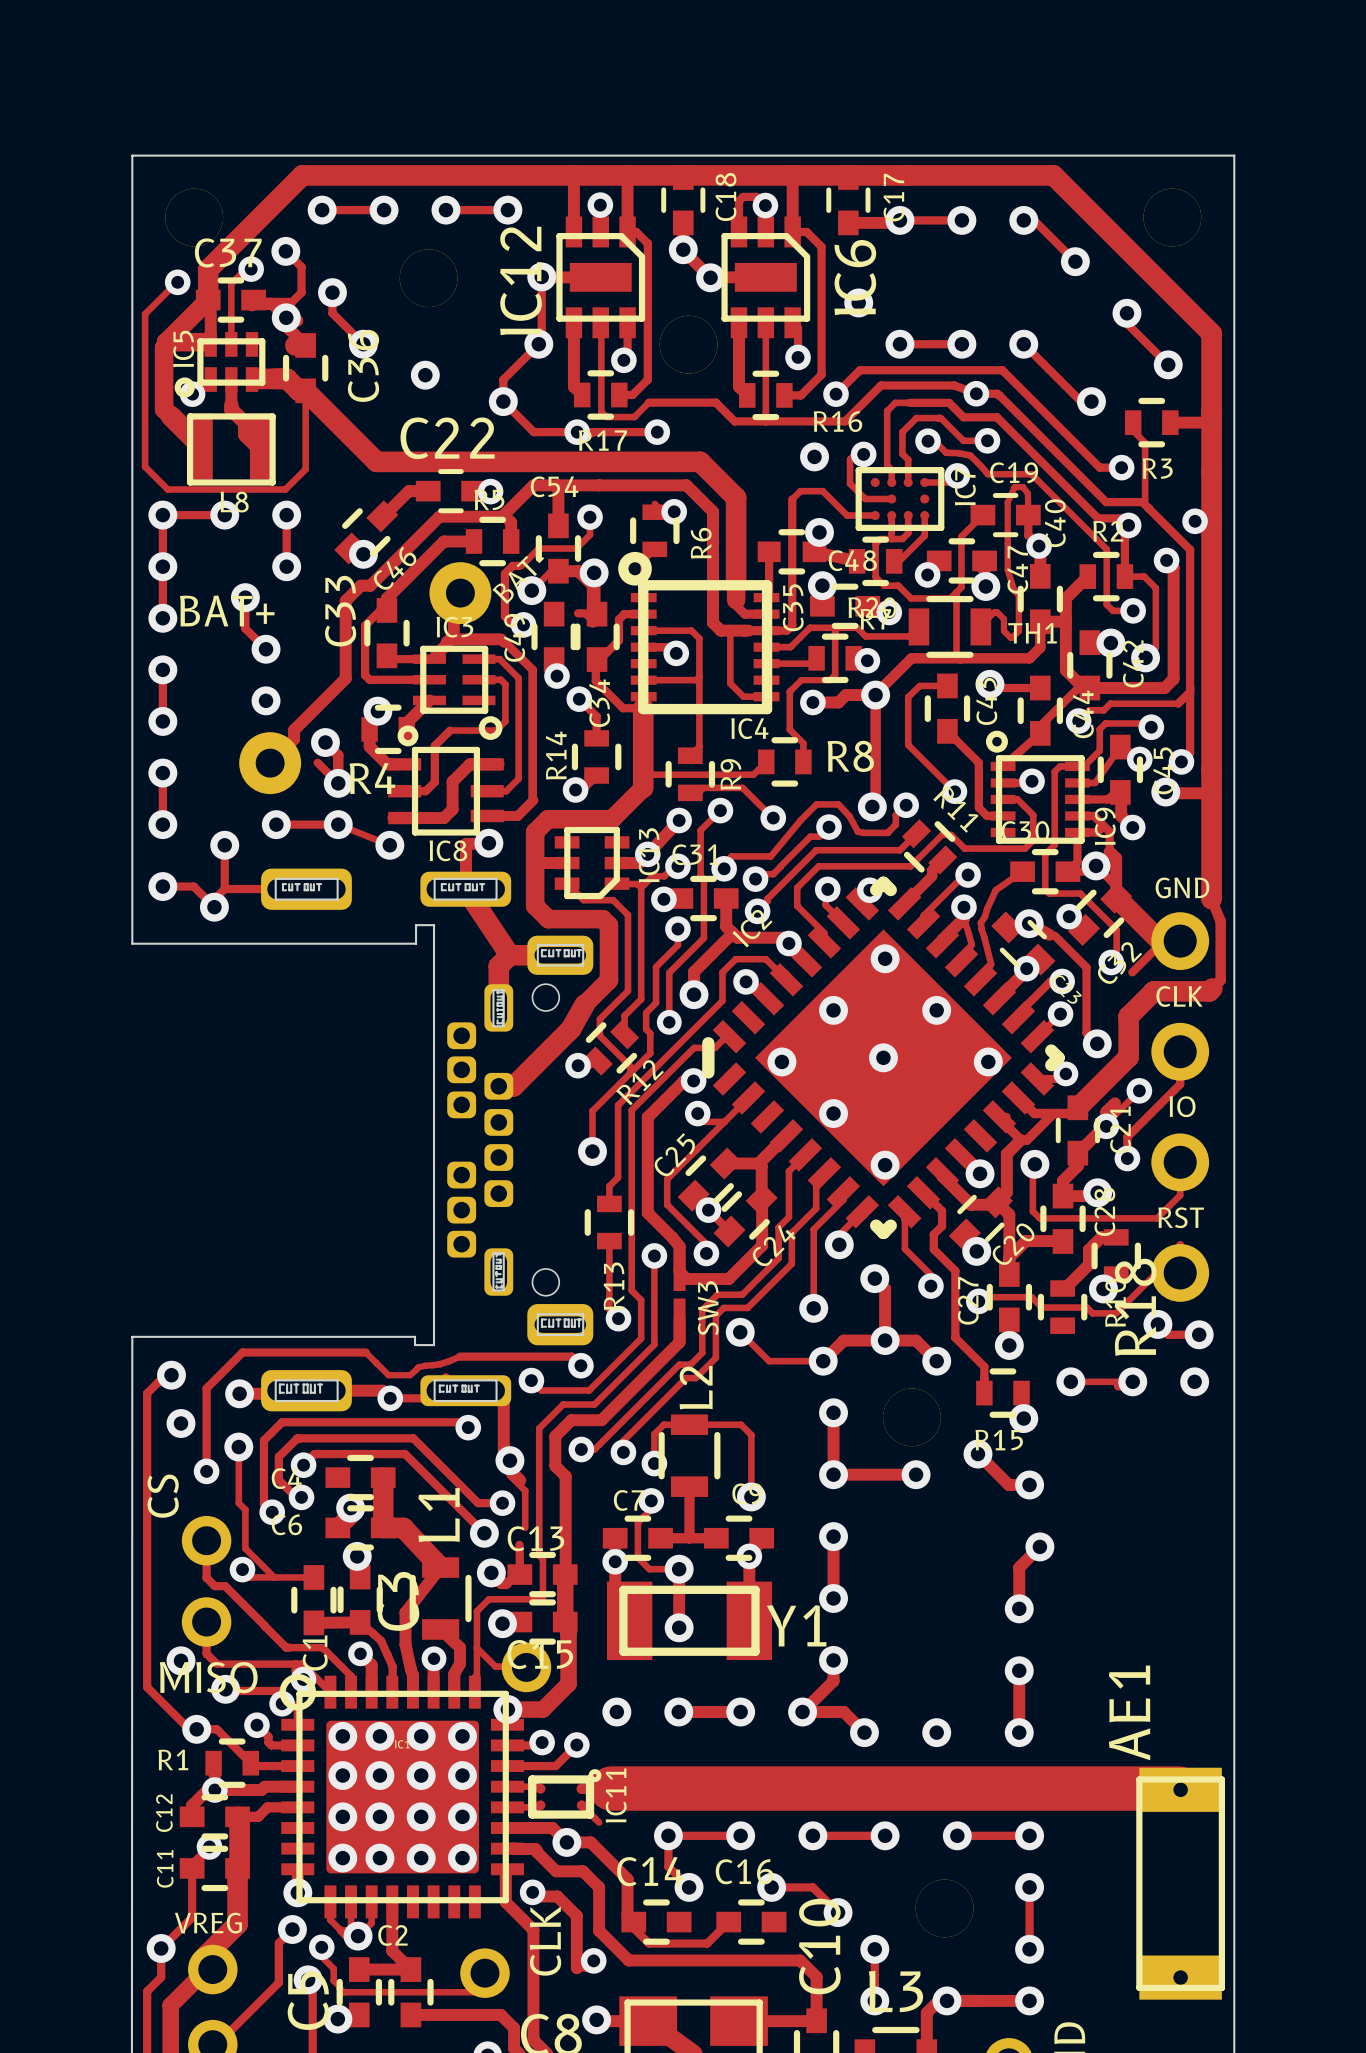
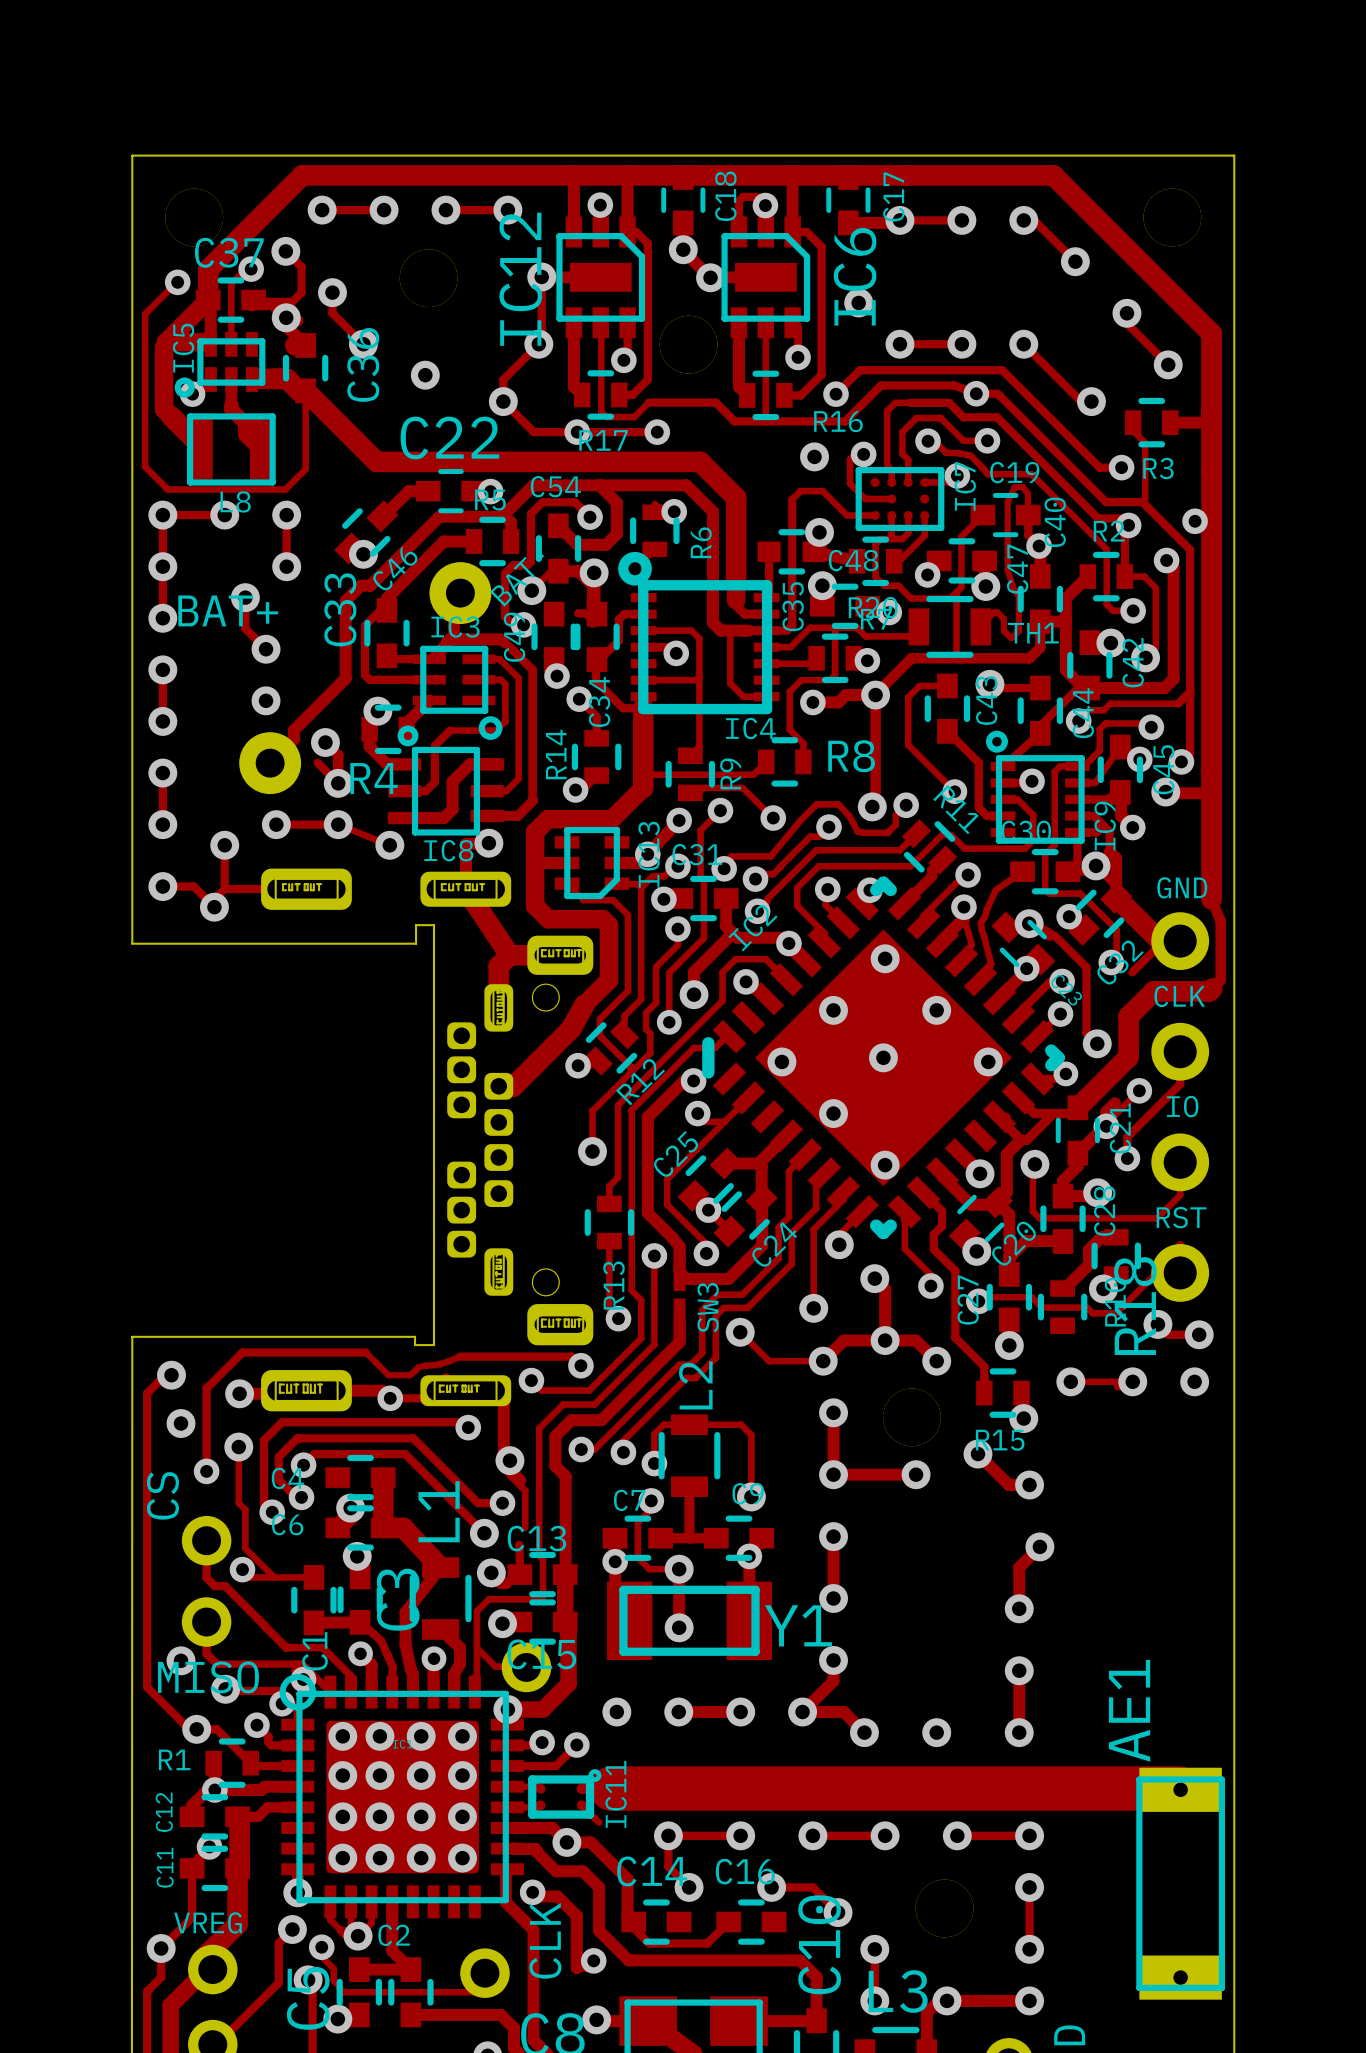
track: (558, 485) (558, 525) -> (599, 485) (616, 502) (616, 534) (606, 544) (577, 544) (558, 525)
track: (590, 517) (590, 534) (576, 548) (538, 548) (521, 565) -> (590, 517) (575, 502) (542, 502) (531, 513) (531, 561) (527, 565) (512, 565)

